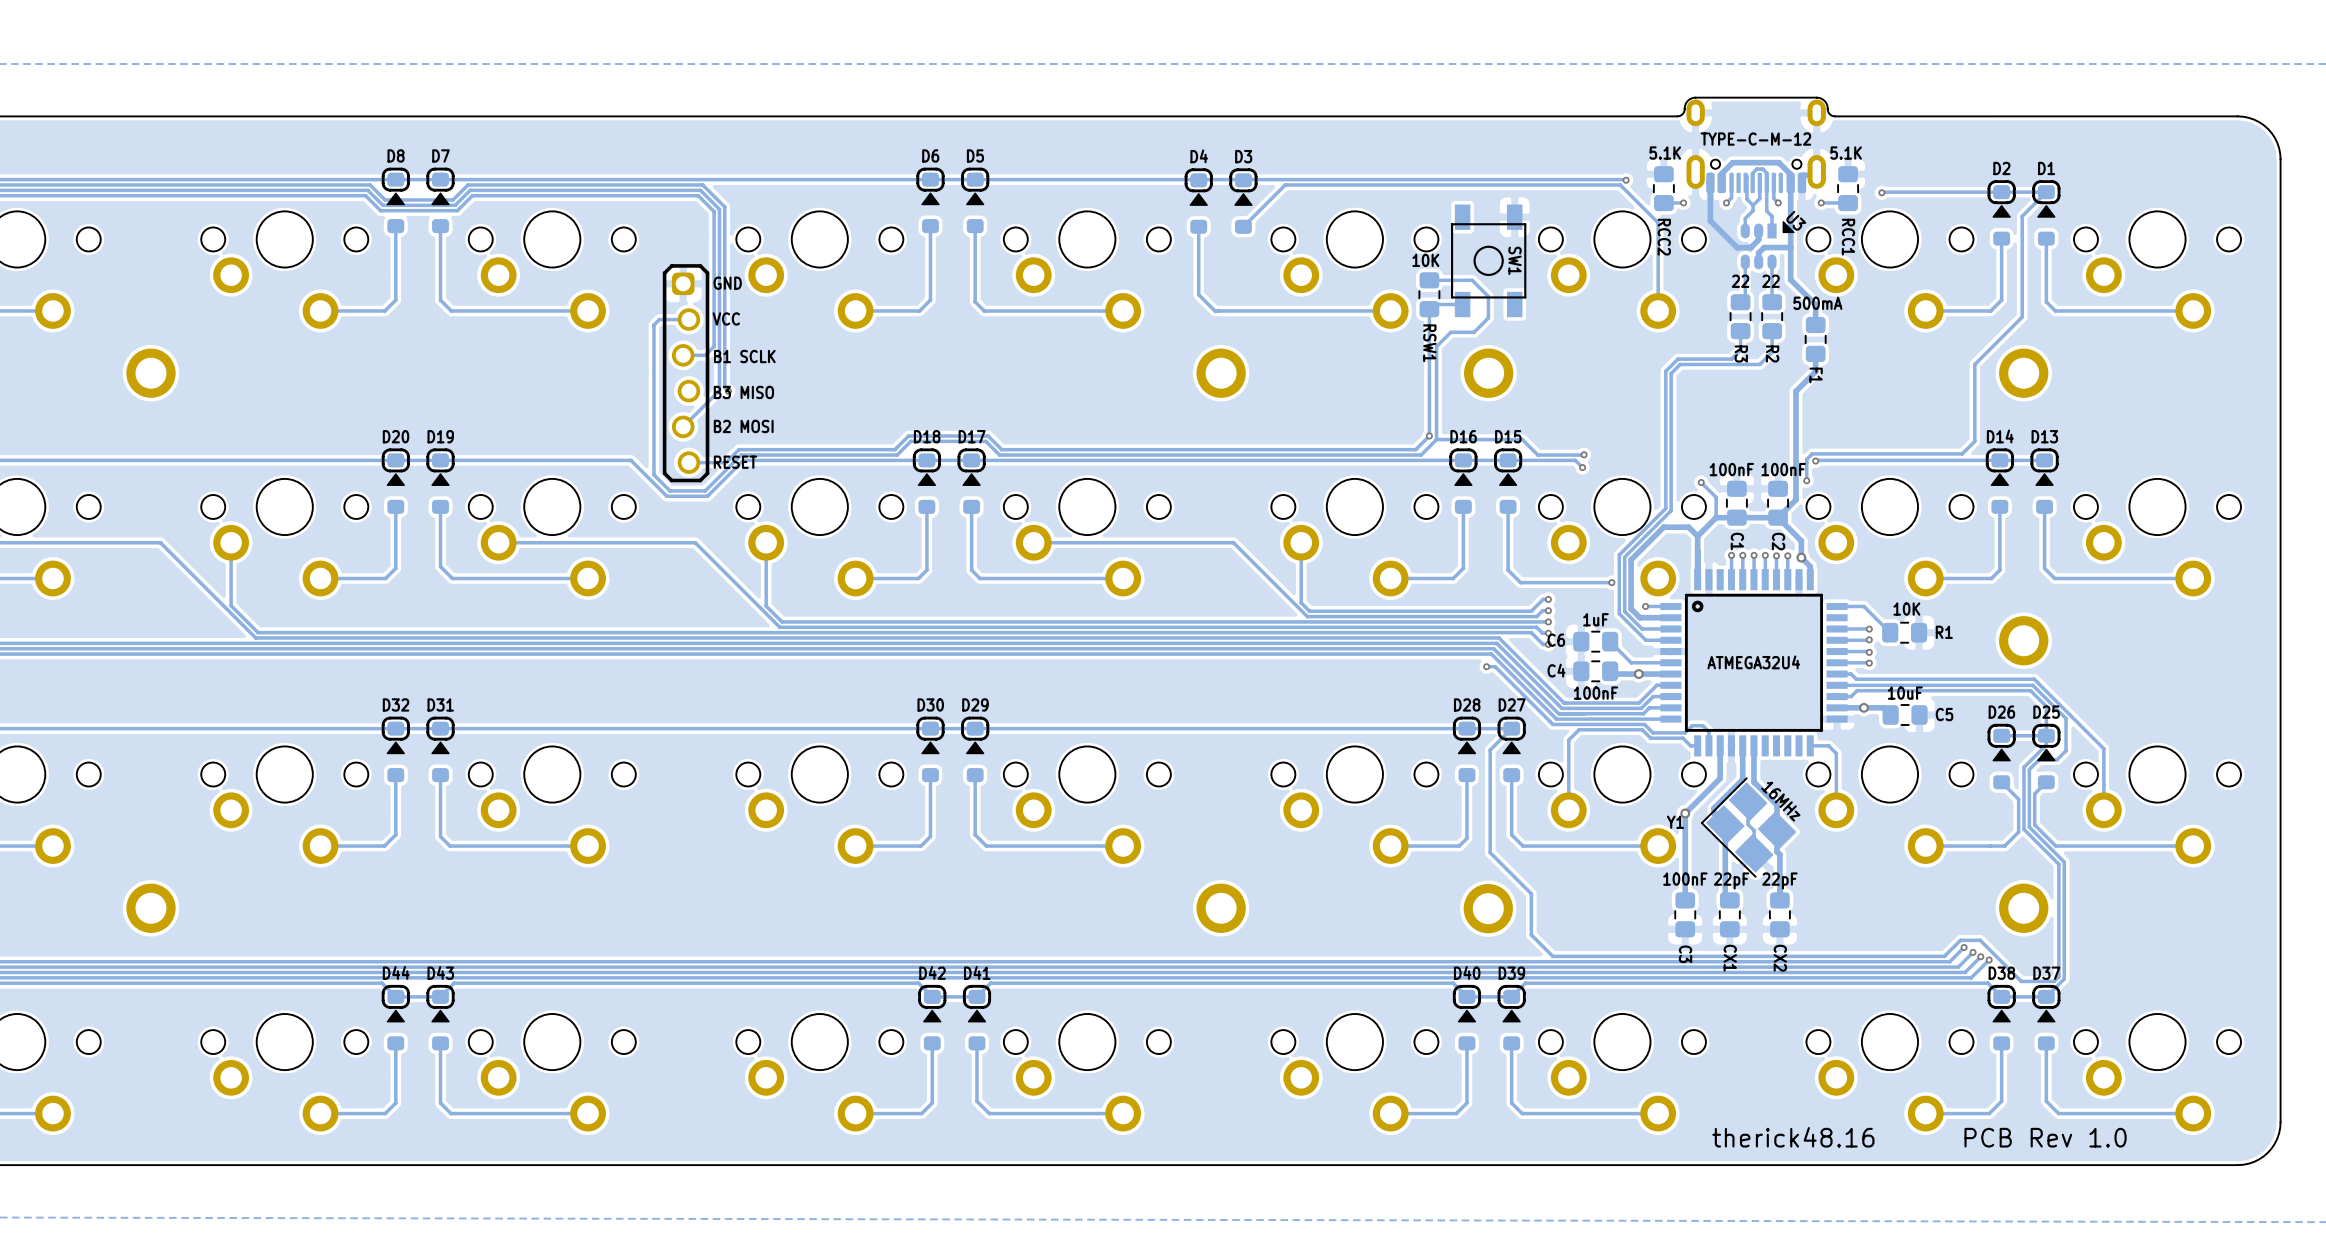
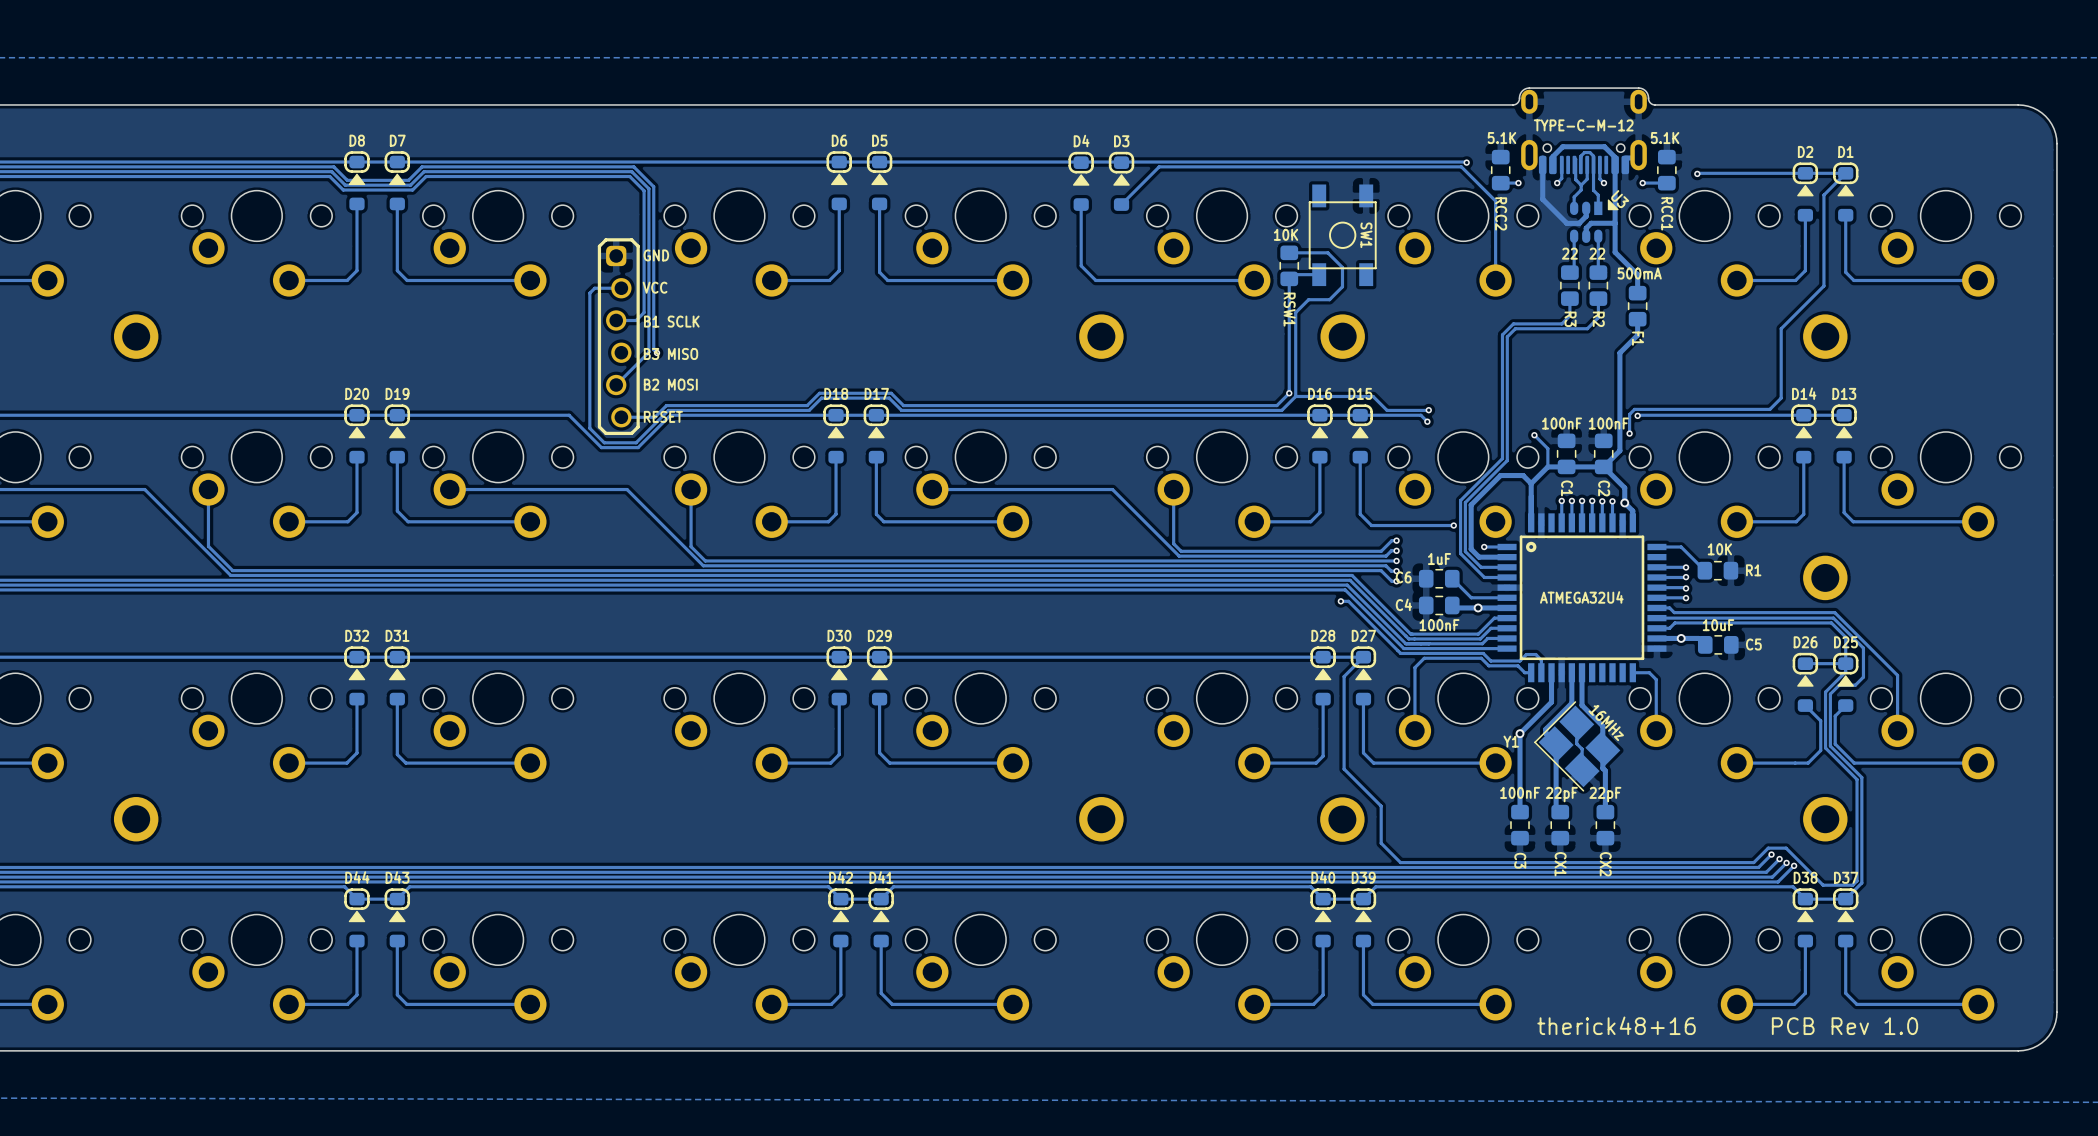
text: therick48.16 (1793, 1137) -> therick48+16 (1616, 1025)

